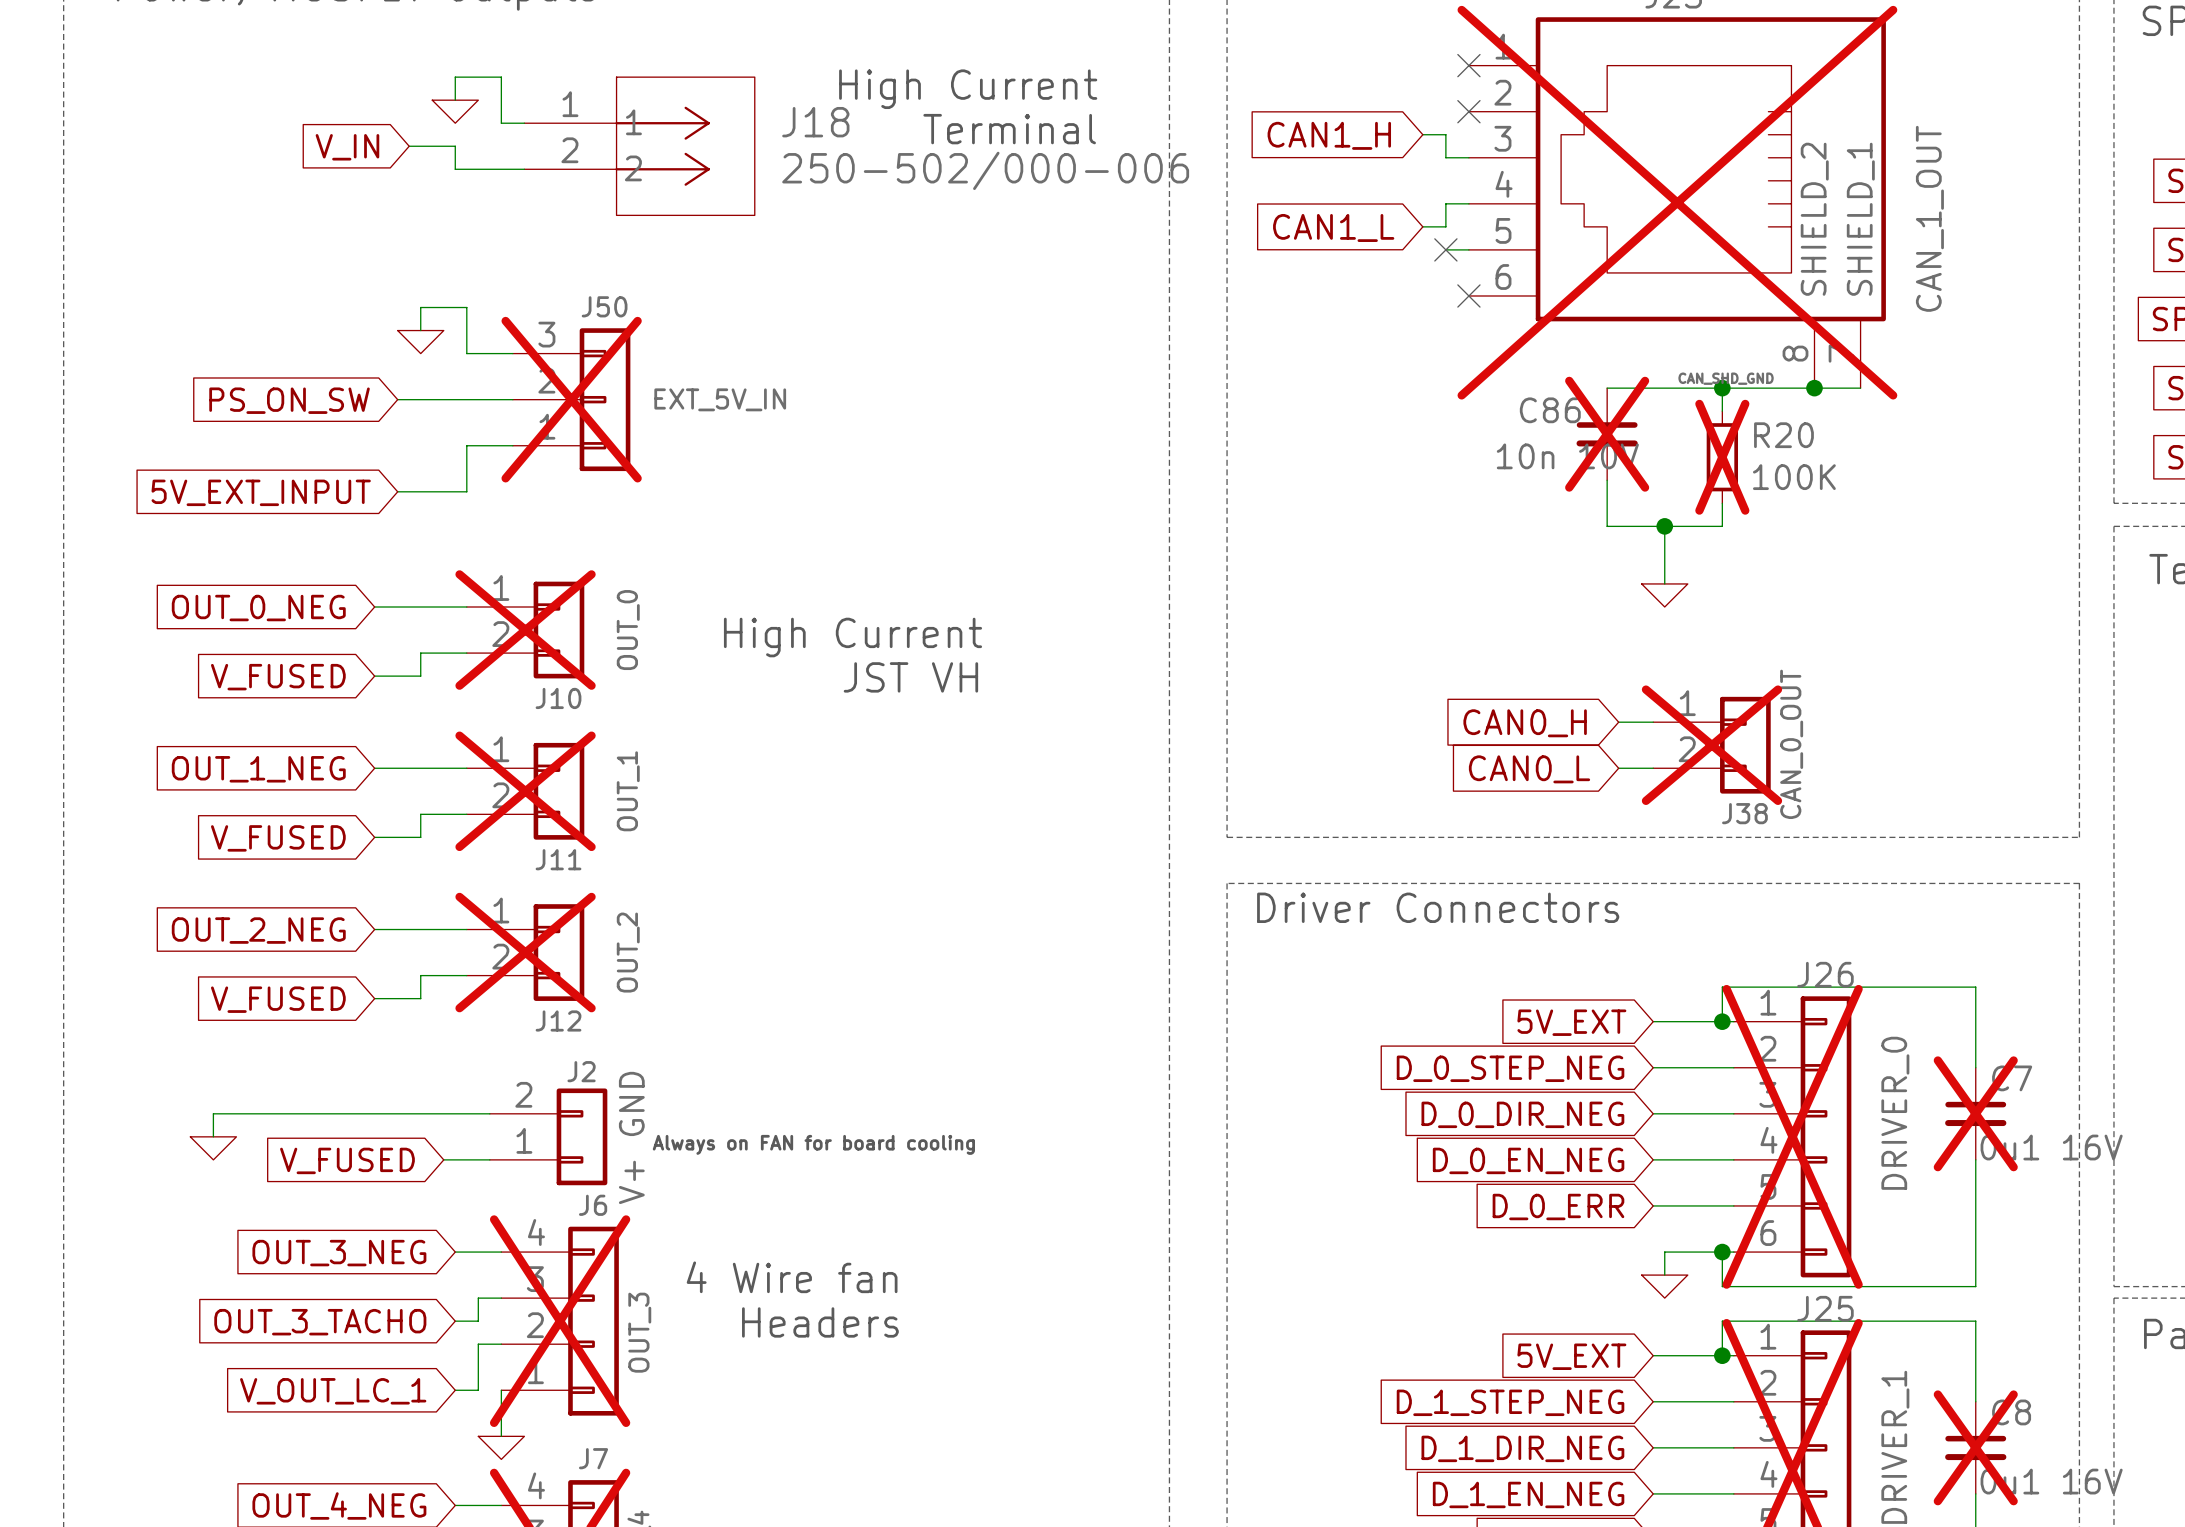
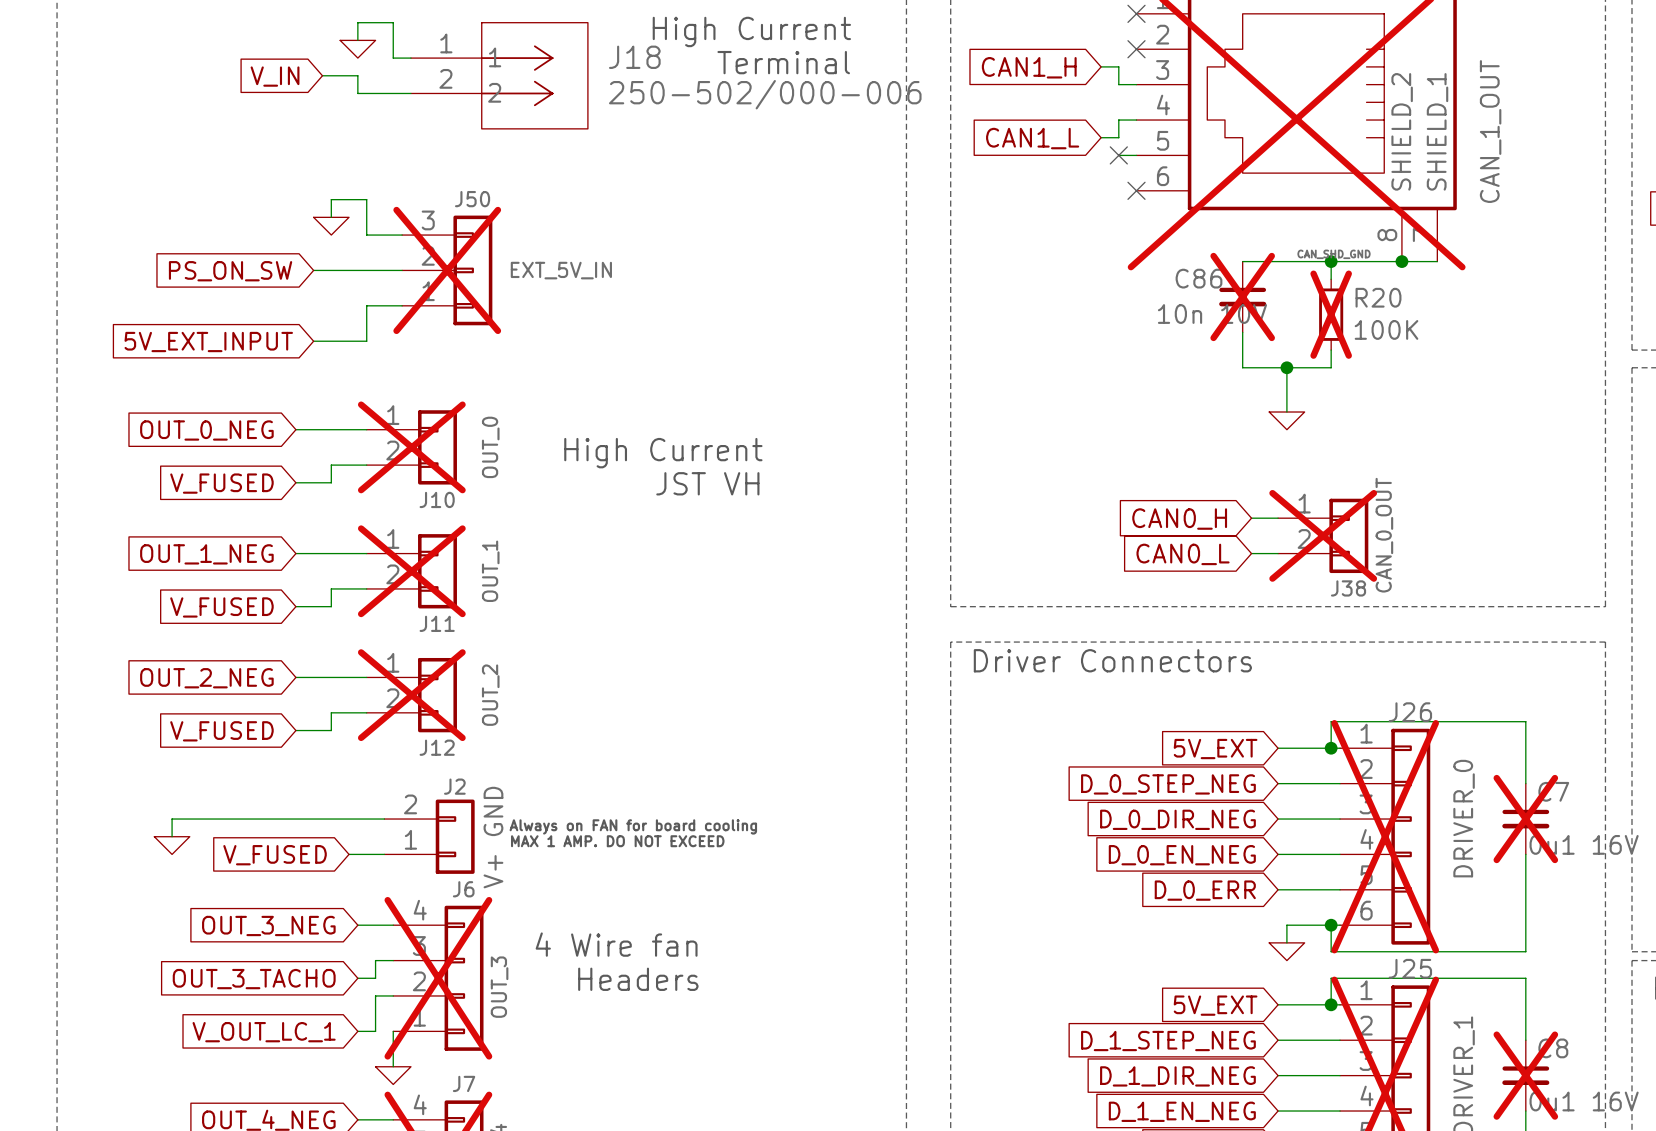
text: none -> Always on FAN for board cooling (633, 826)
text: Always on FAN for board cooling (813, 1144) -> MAX 1 AMP. DO NOT EXCEED (617, 841)

